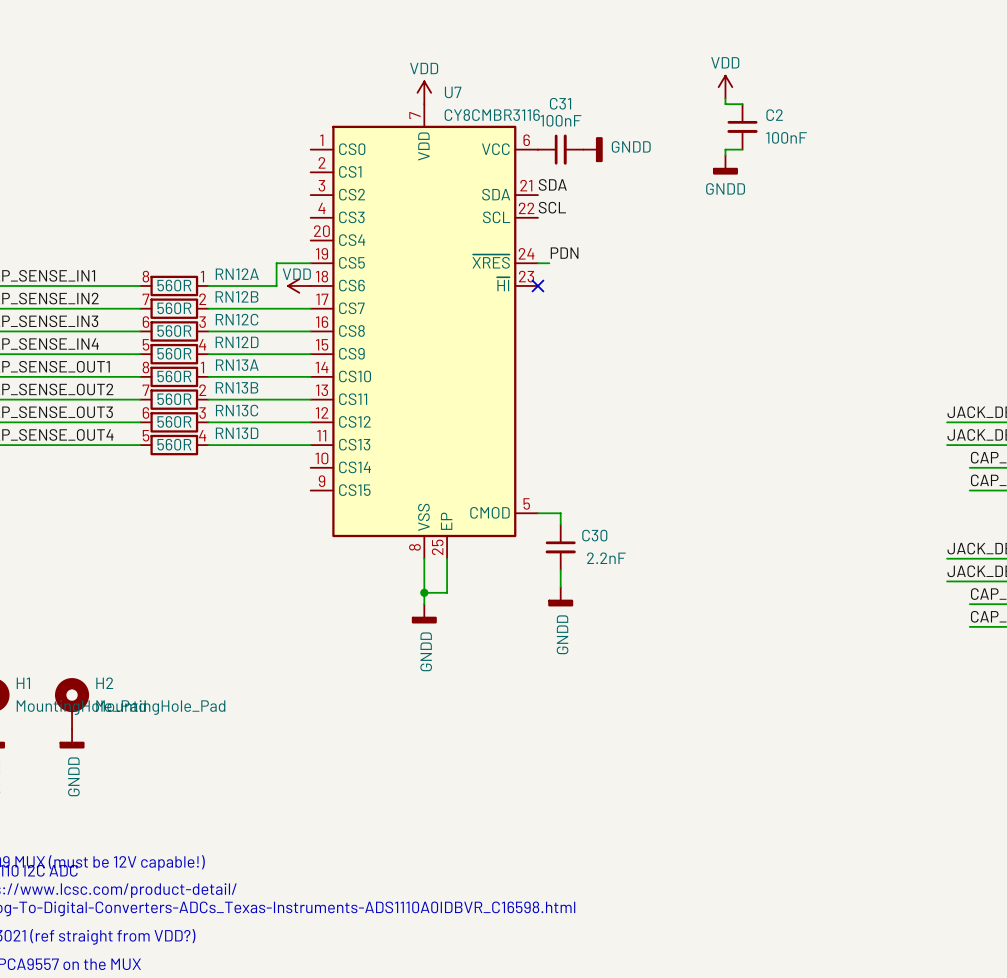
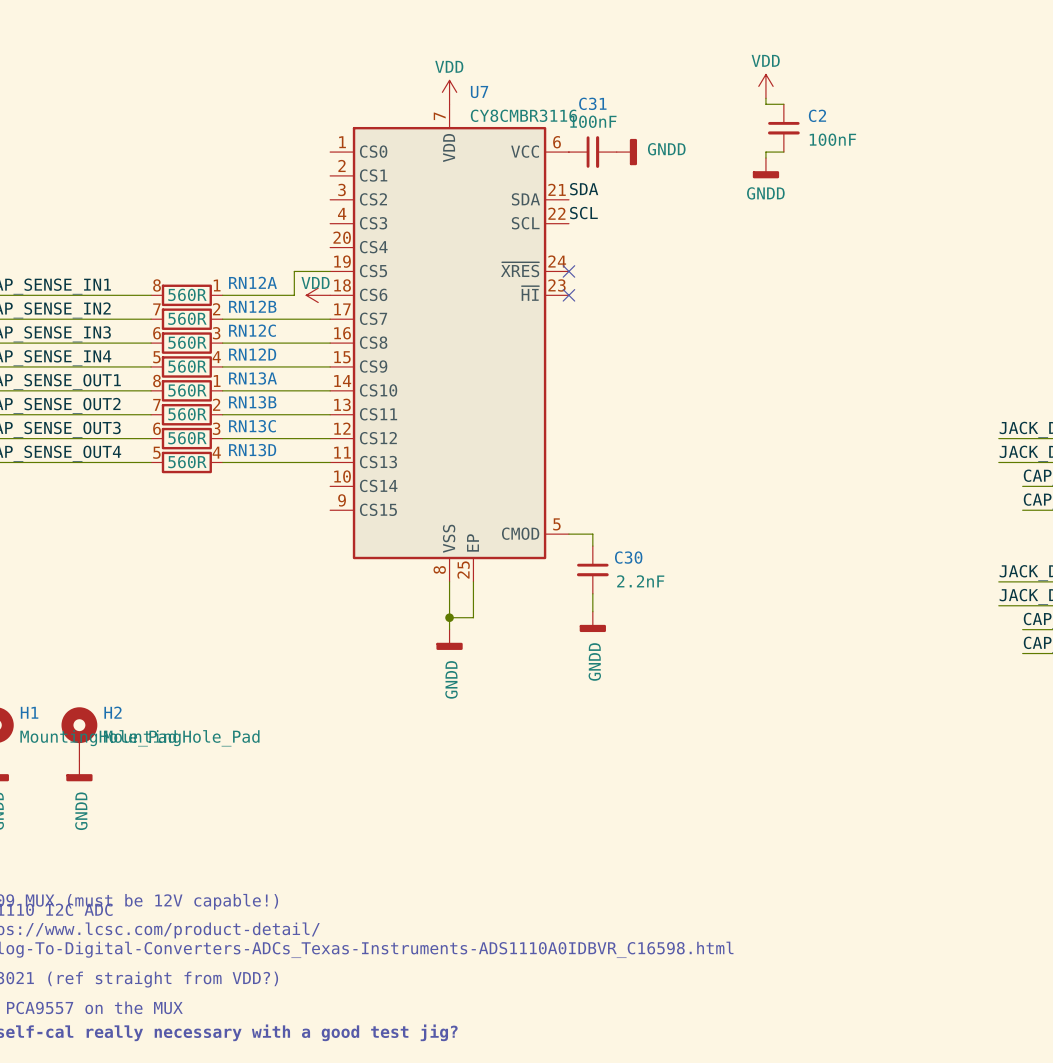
label: PDN (564, 253) -> none
wire: (537, 263) (549, 263) -> none
no-connect mark: none -> (568, 271)

